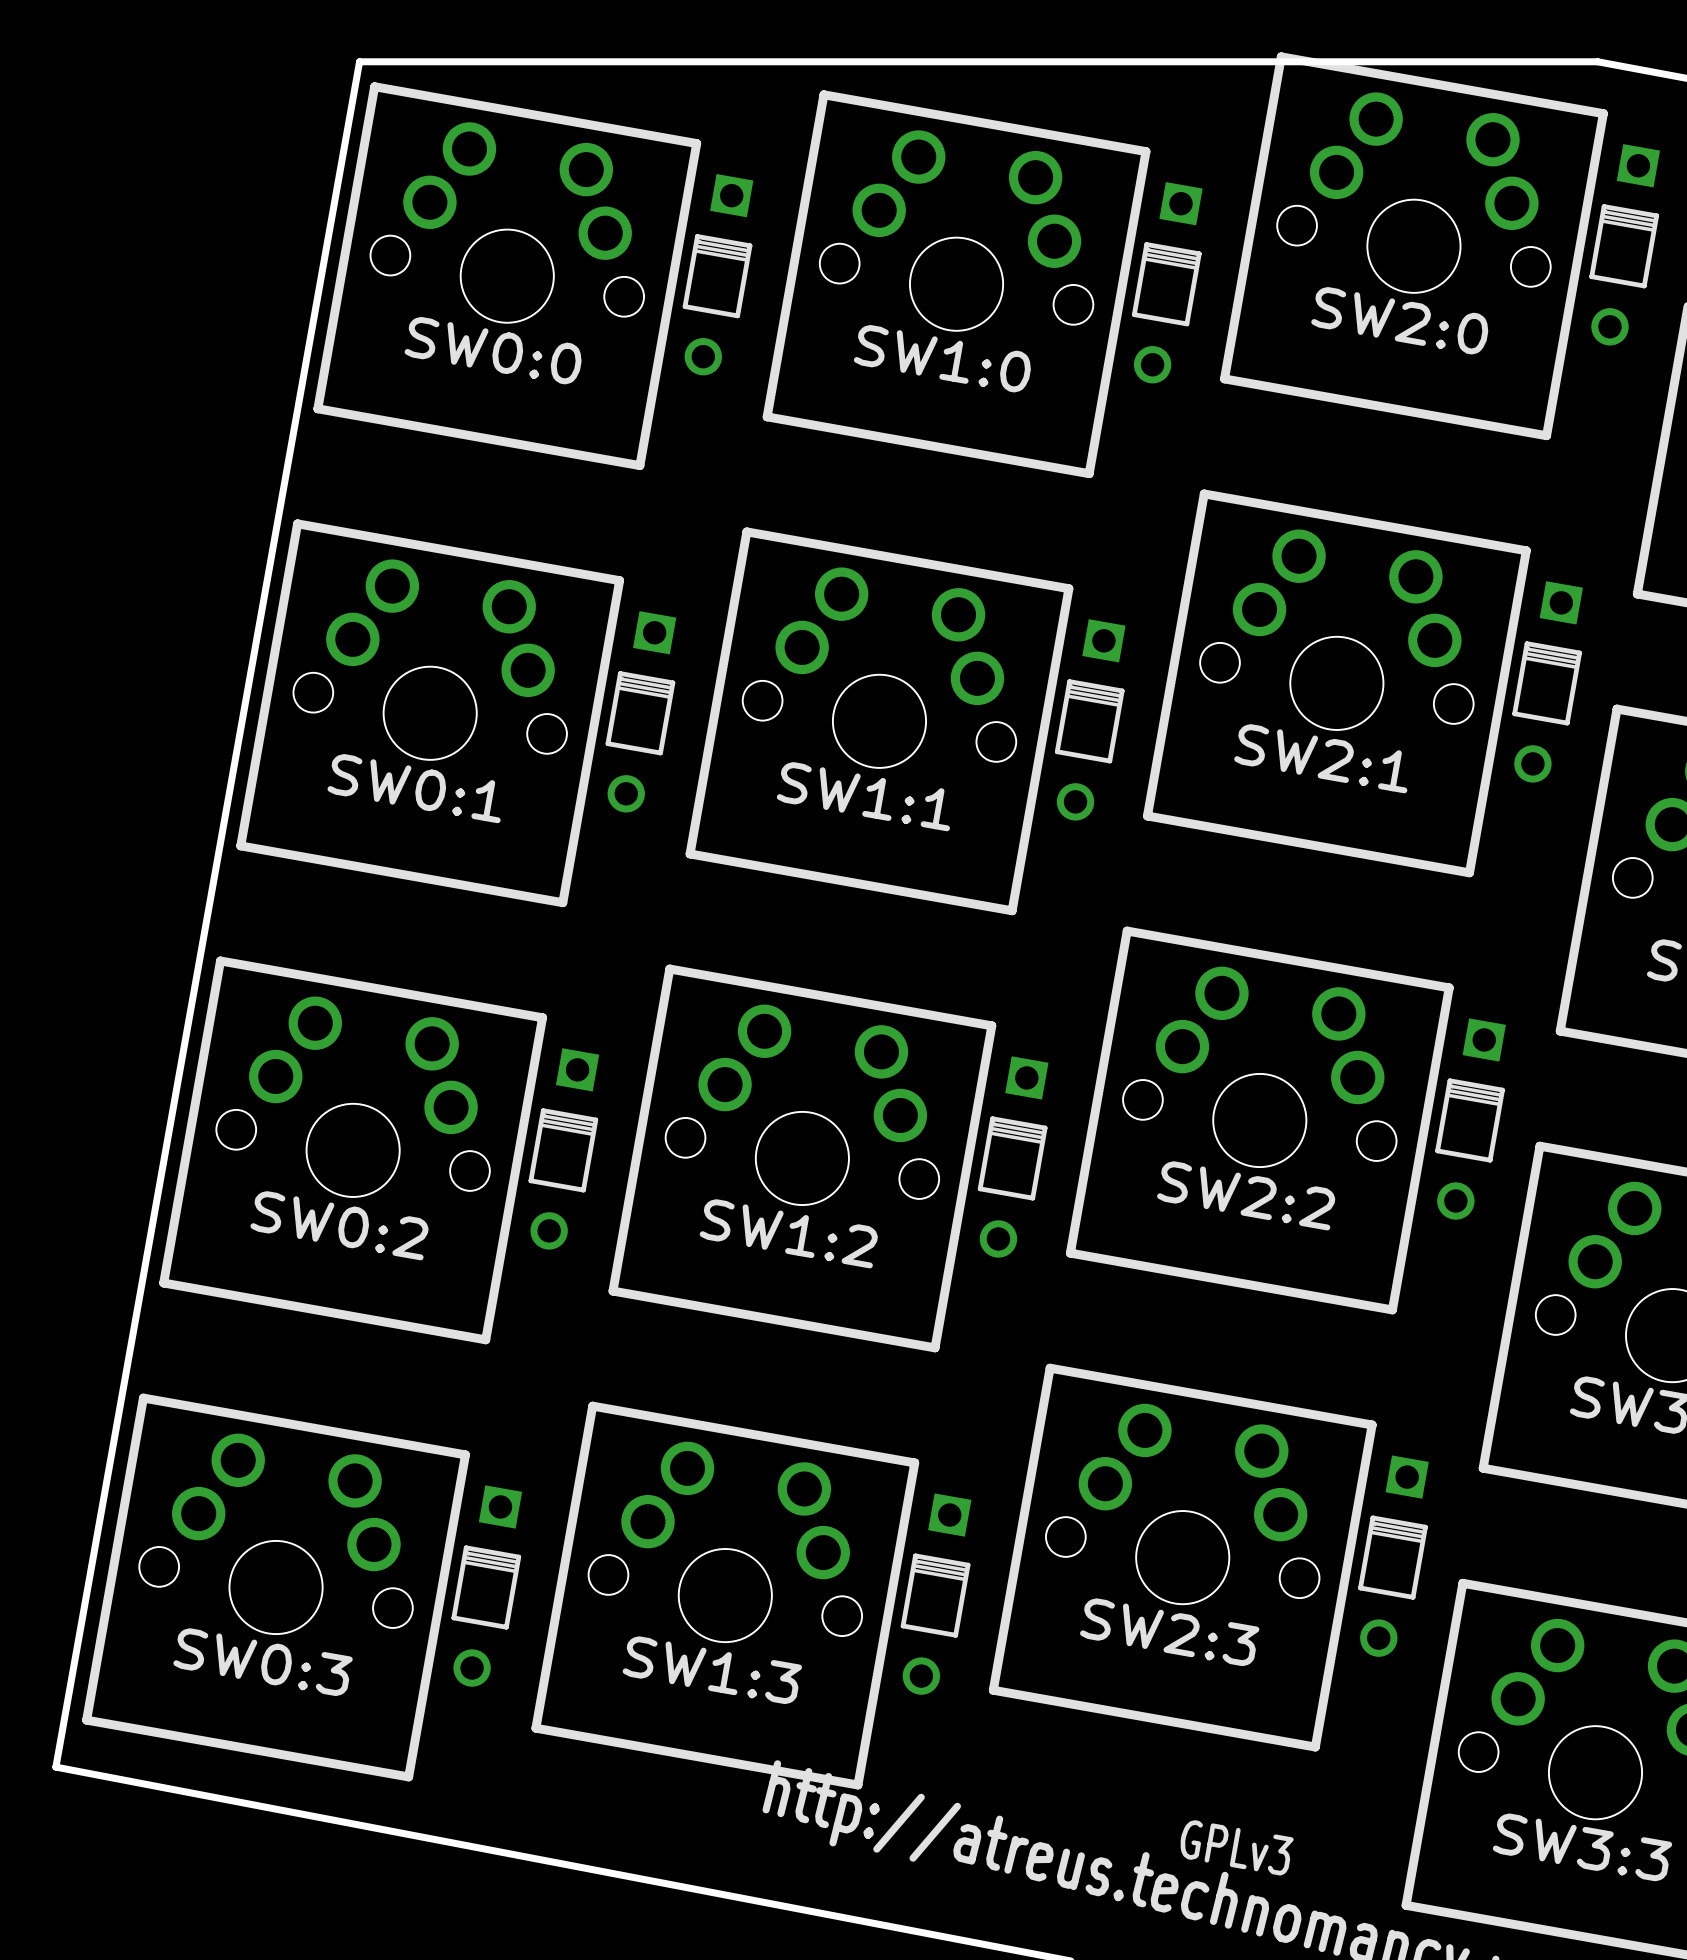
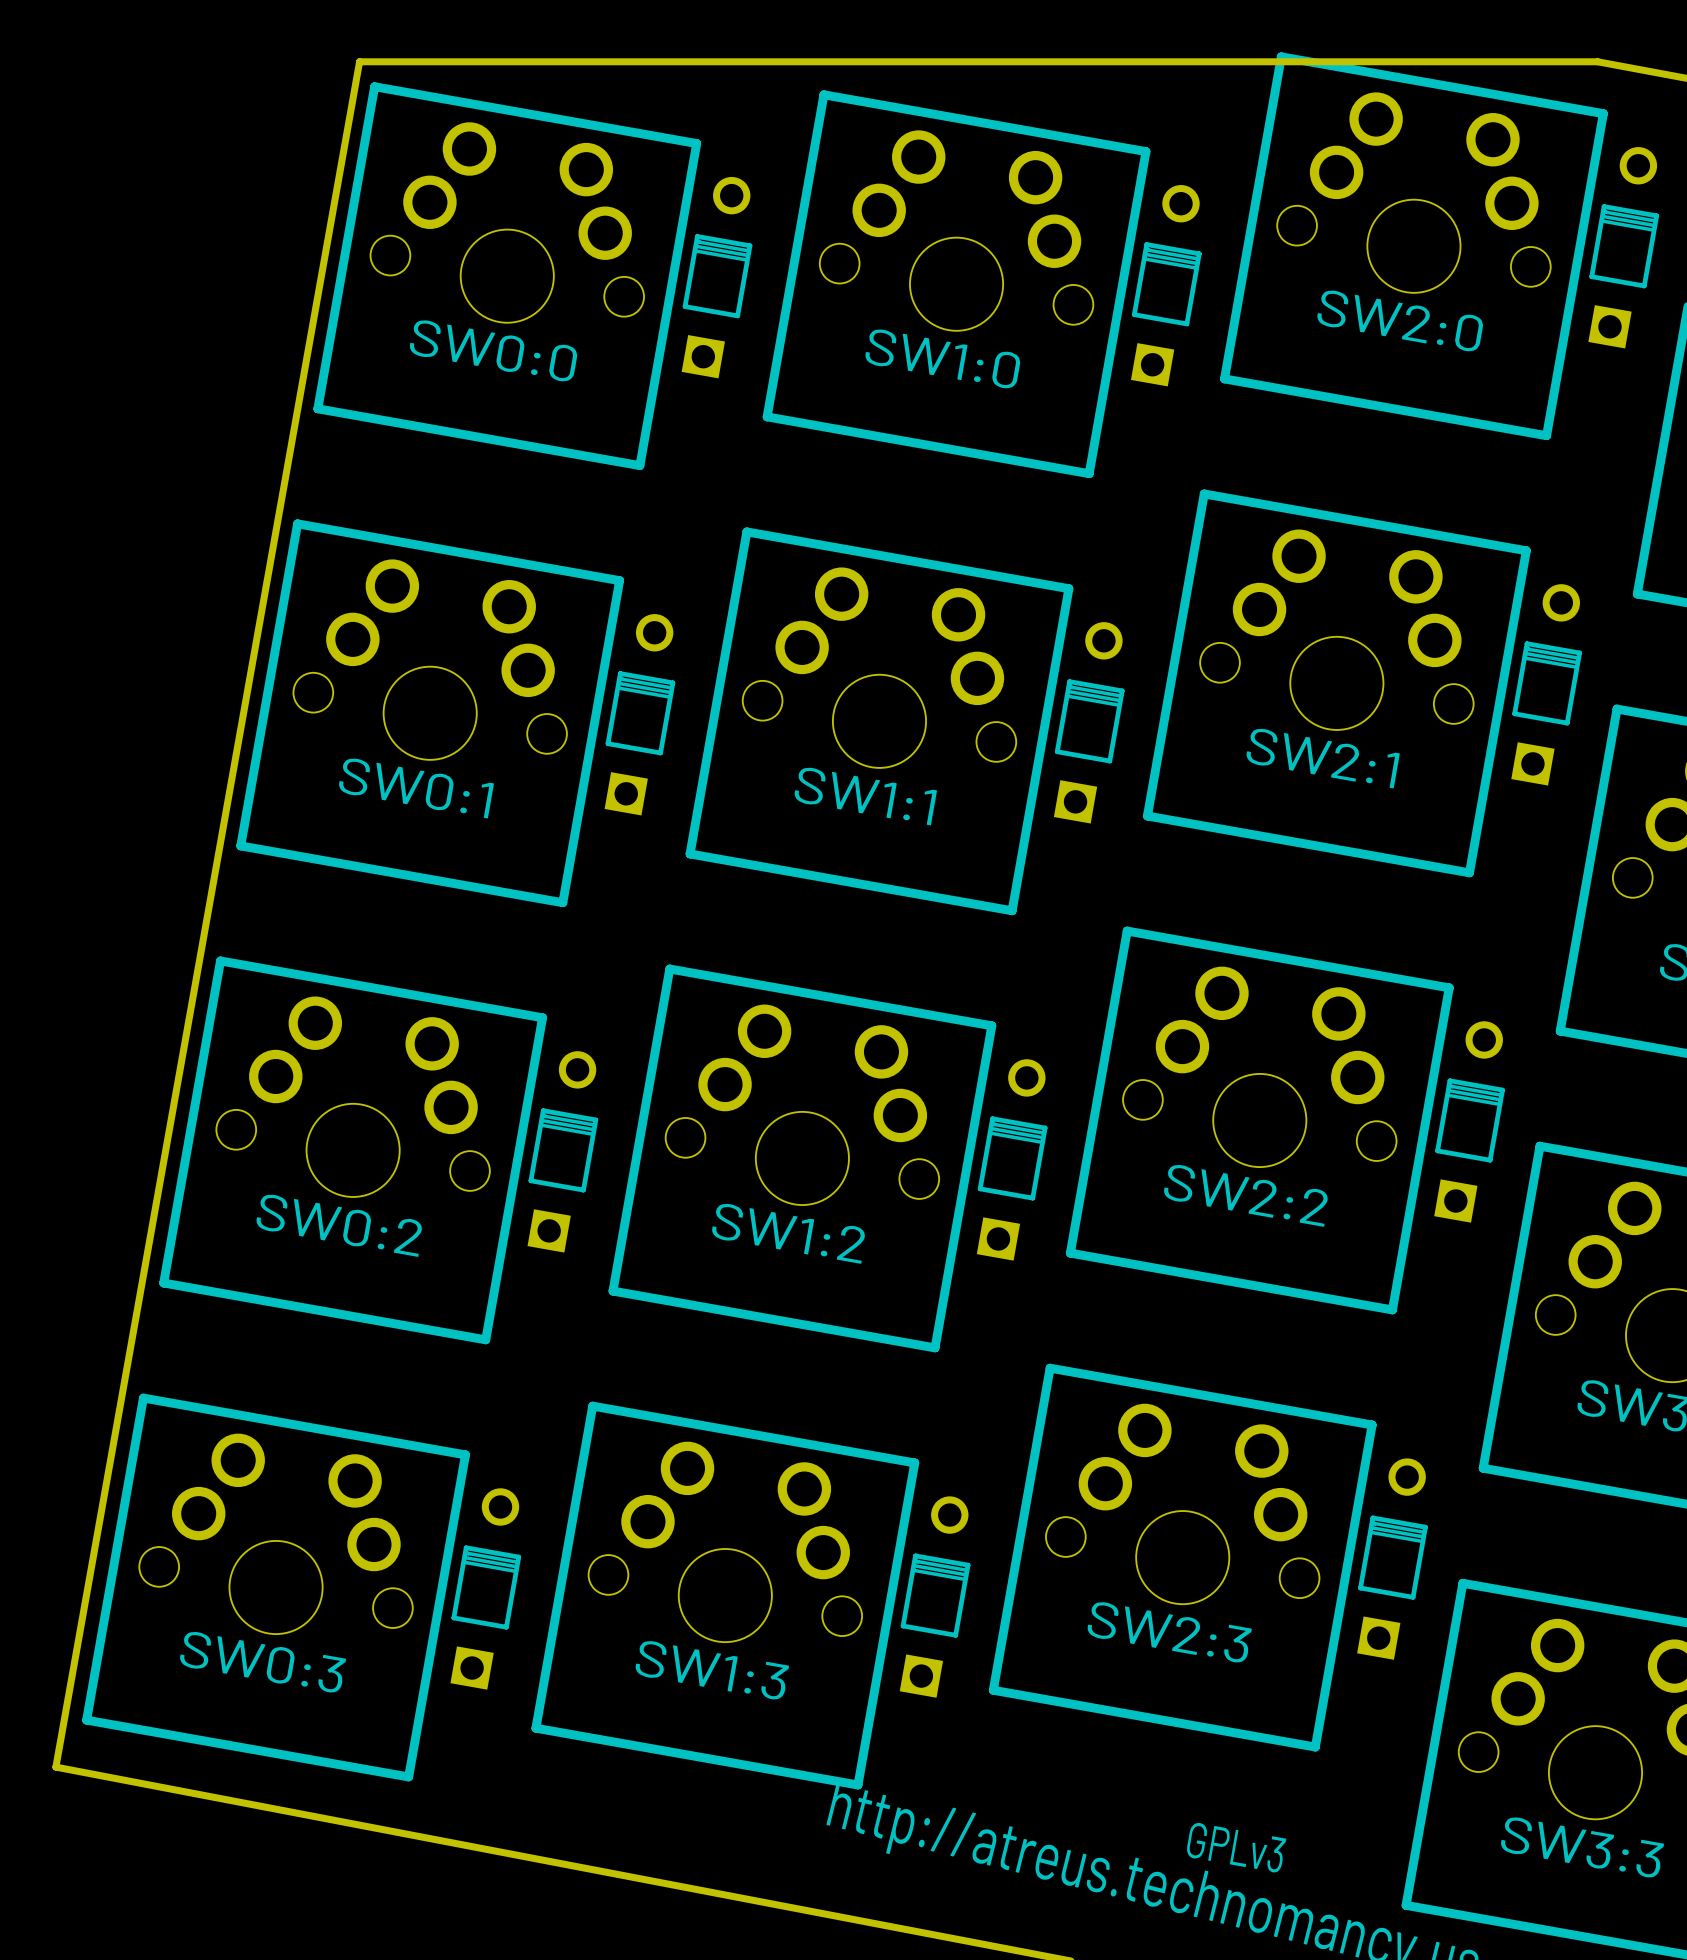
part footprint: [1589, 144, 1661, 346] -> [1588, 147, 1660, 349]
part footprint: [682, 174, 754, 376] -> [681, 176, 753, 379]
part footprint: [1131, 182, 1203, 384] -> [1130, 185, 1202, 387]
part footprint: [1512, 581, 1583, 783] -> [1511, 584, 1582, 786]
part footprint: [605, 611, 677, 813] -> [604, 614, 676, 816]
part footprint: [1054, 619, 1126, 821] -> [1053, 622, 1125, 824]
part footprint: [1435, 1018, 1506, 1220] -> [1434, 1021, 1505, 1223]
part footprint: [528, 1048, 600, 1250] -> [527, 1051, 599, 1253]
part footprint: [977, 1056, 1049, 1258] -> [976, 1059, 1048, 1261]
part footprint: [1358, 1455, 1429, 1657] -> [1357, 1458, 1428, 1660]
part footprint: [451, 1485, 523, 1687] -> [450, 1488, 522, 1690]
part footprint: [900, 1493, 972, 1695] -> [899, 1496, 971, 1698]

